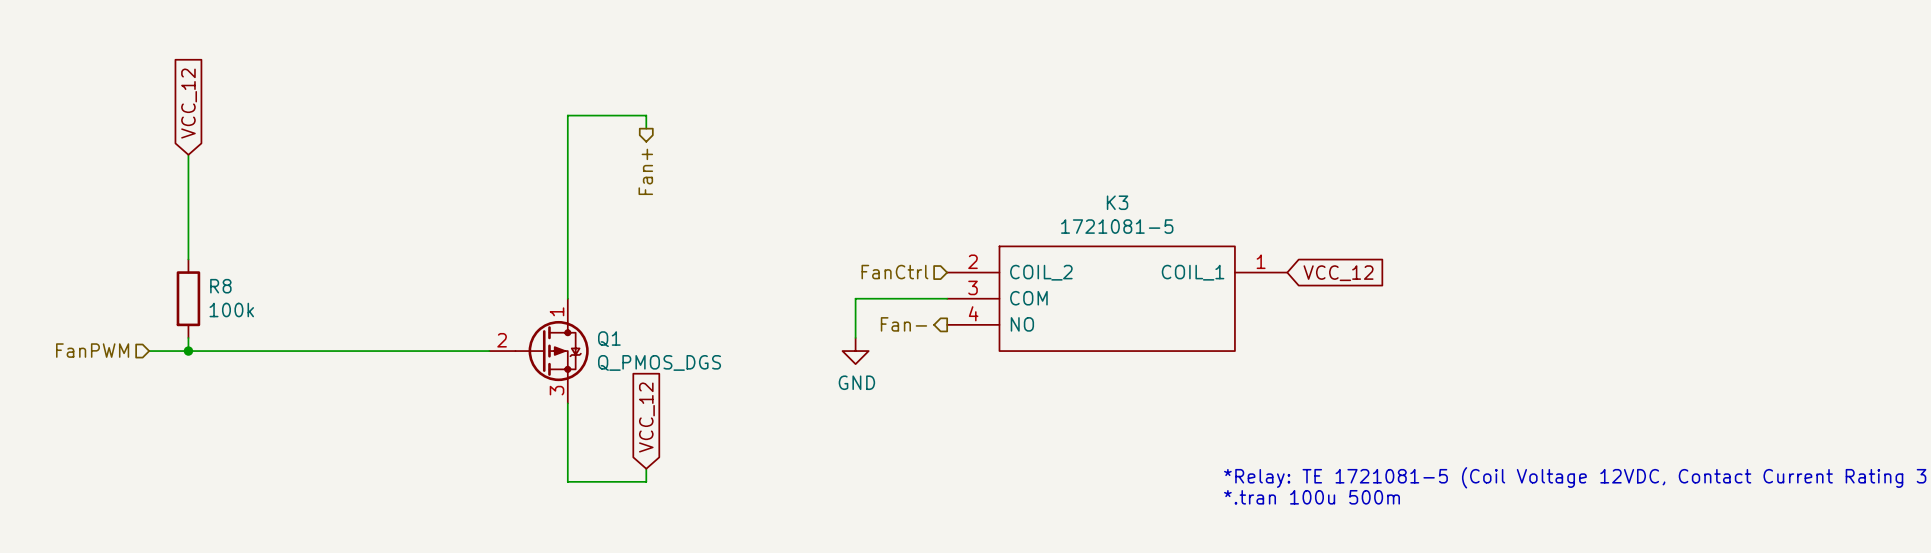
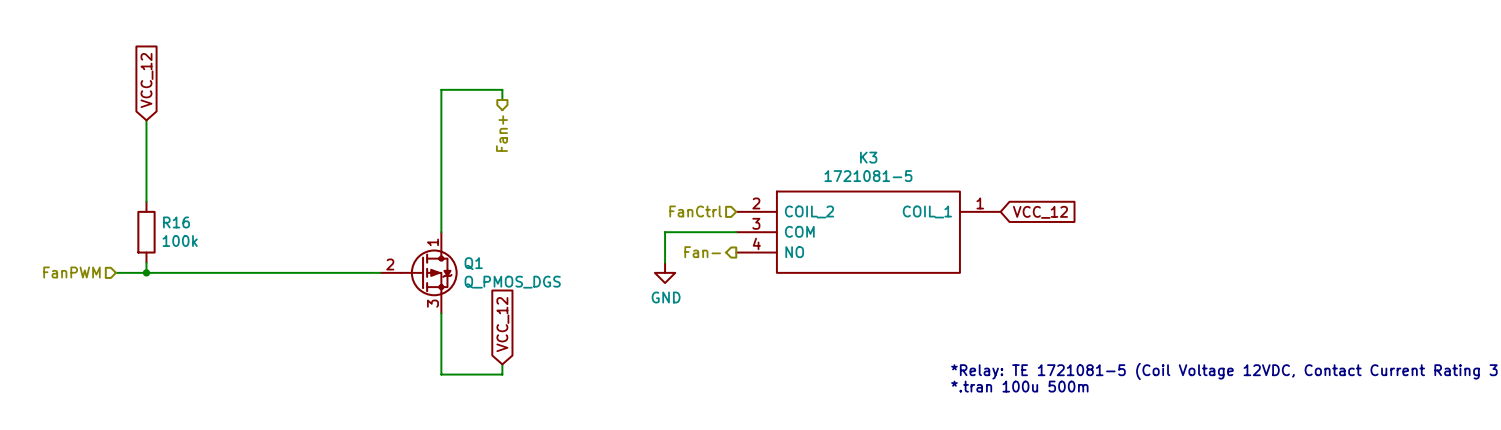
R8 name: R8 (220, 286) -> R16 (176, 222)

